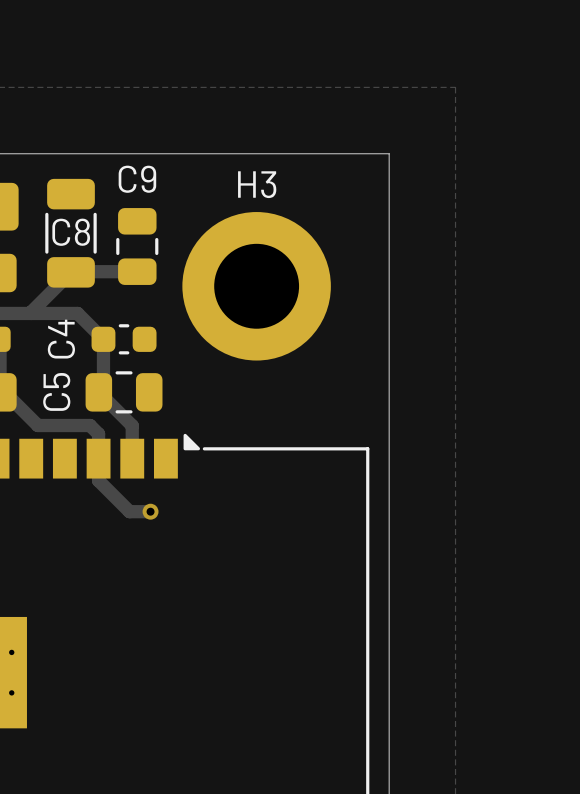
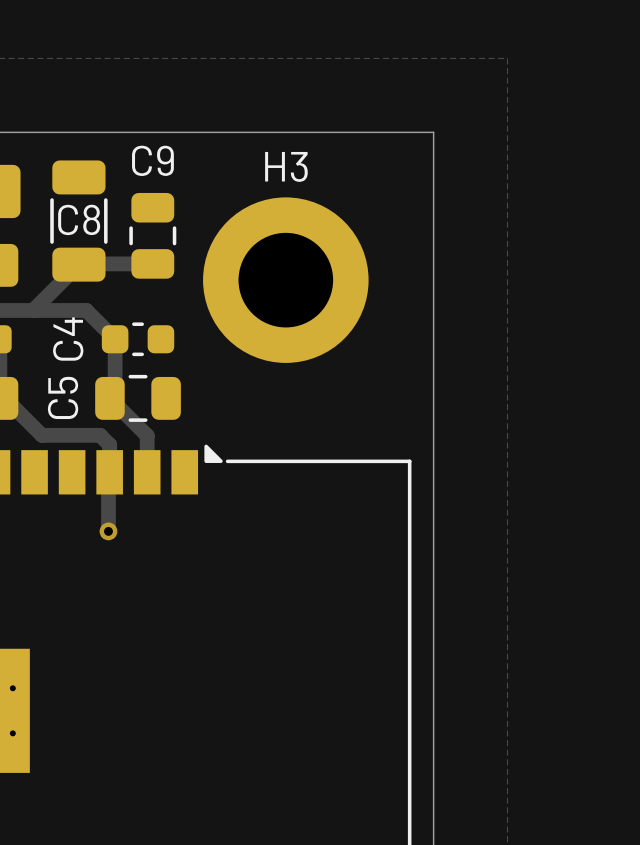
track: (98, 458) (98, 480) (129, 511) (150, 511) -> (109, 472) (108, 531)
via position: (150, 511) -> (108, 531)

